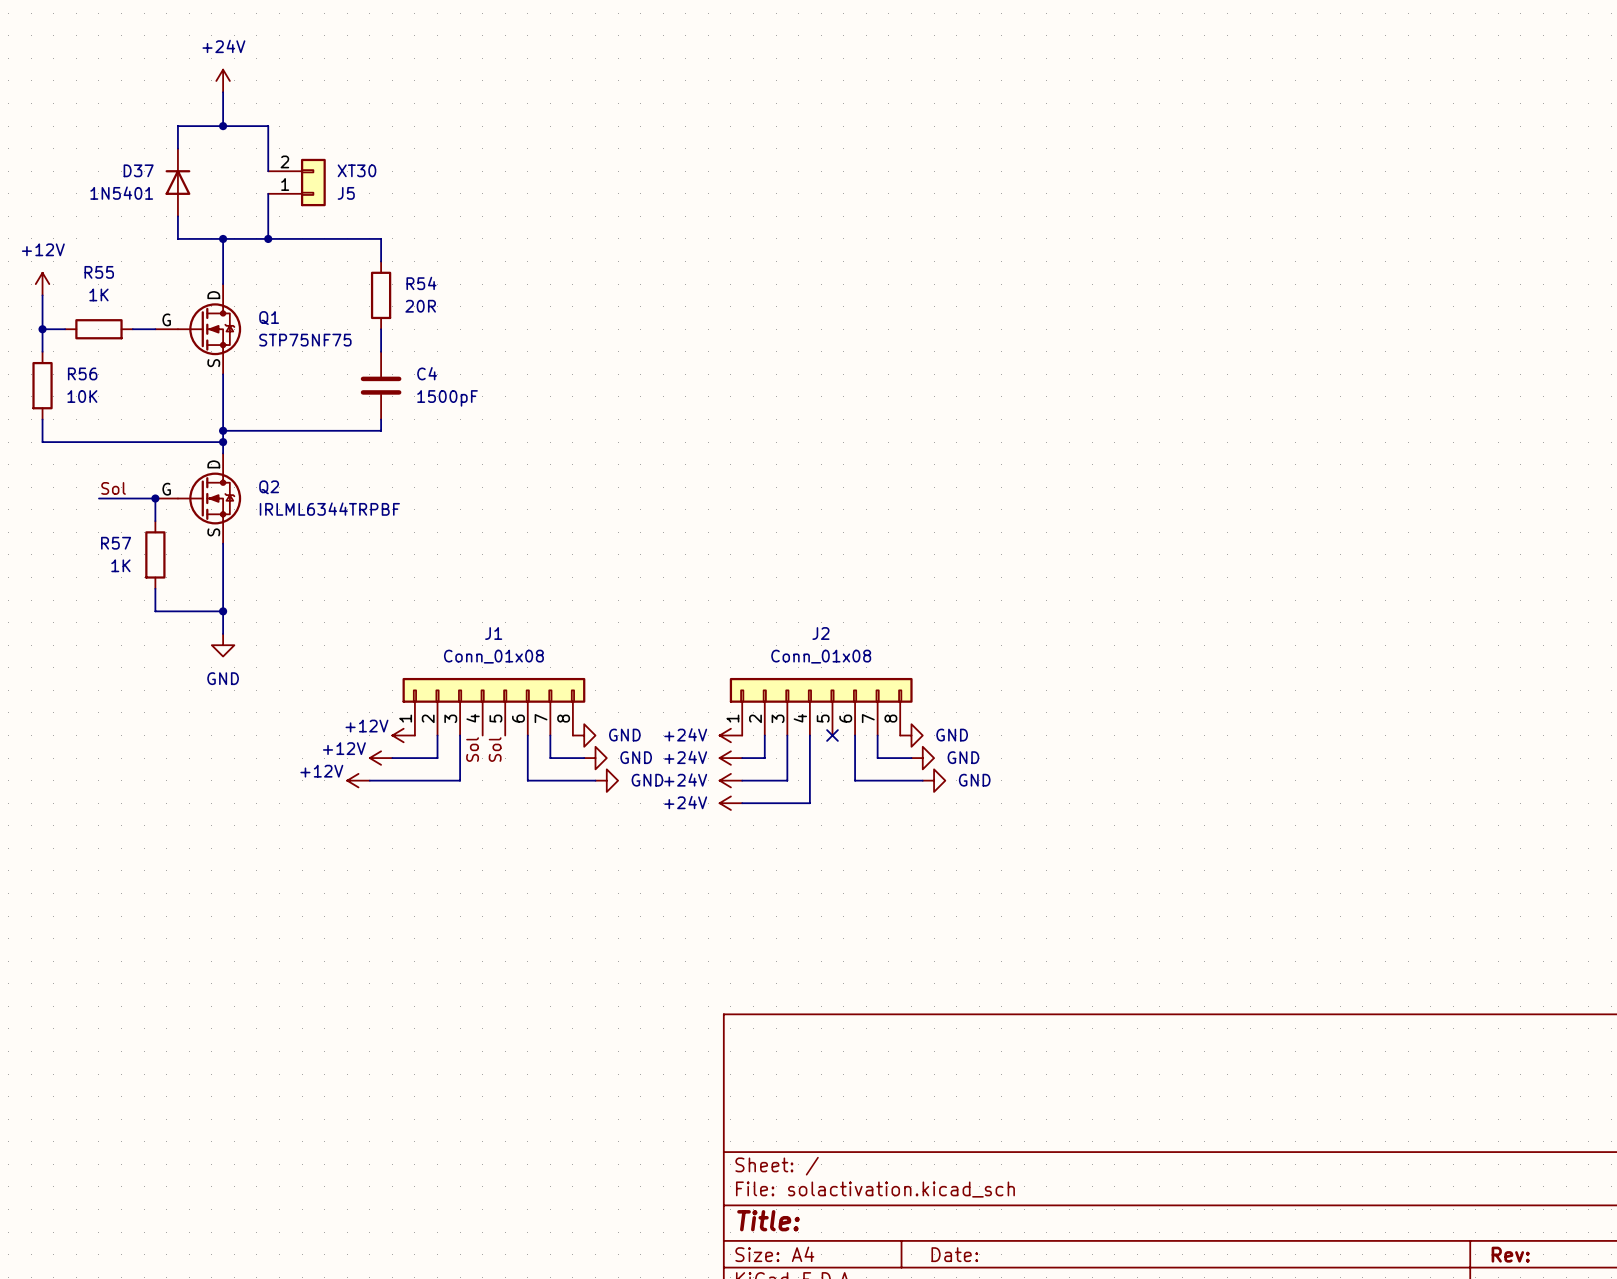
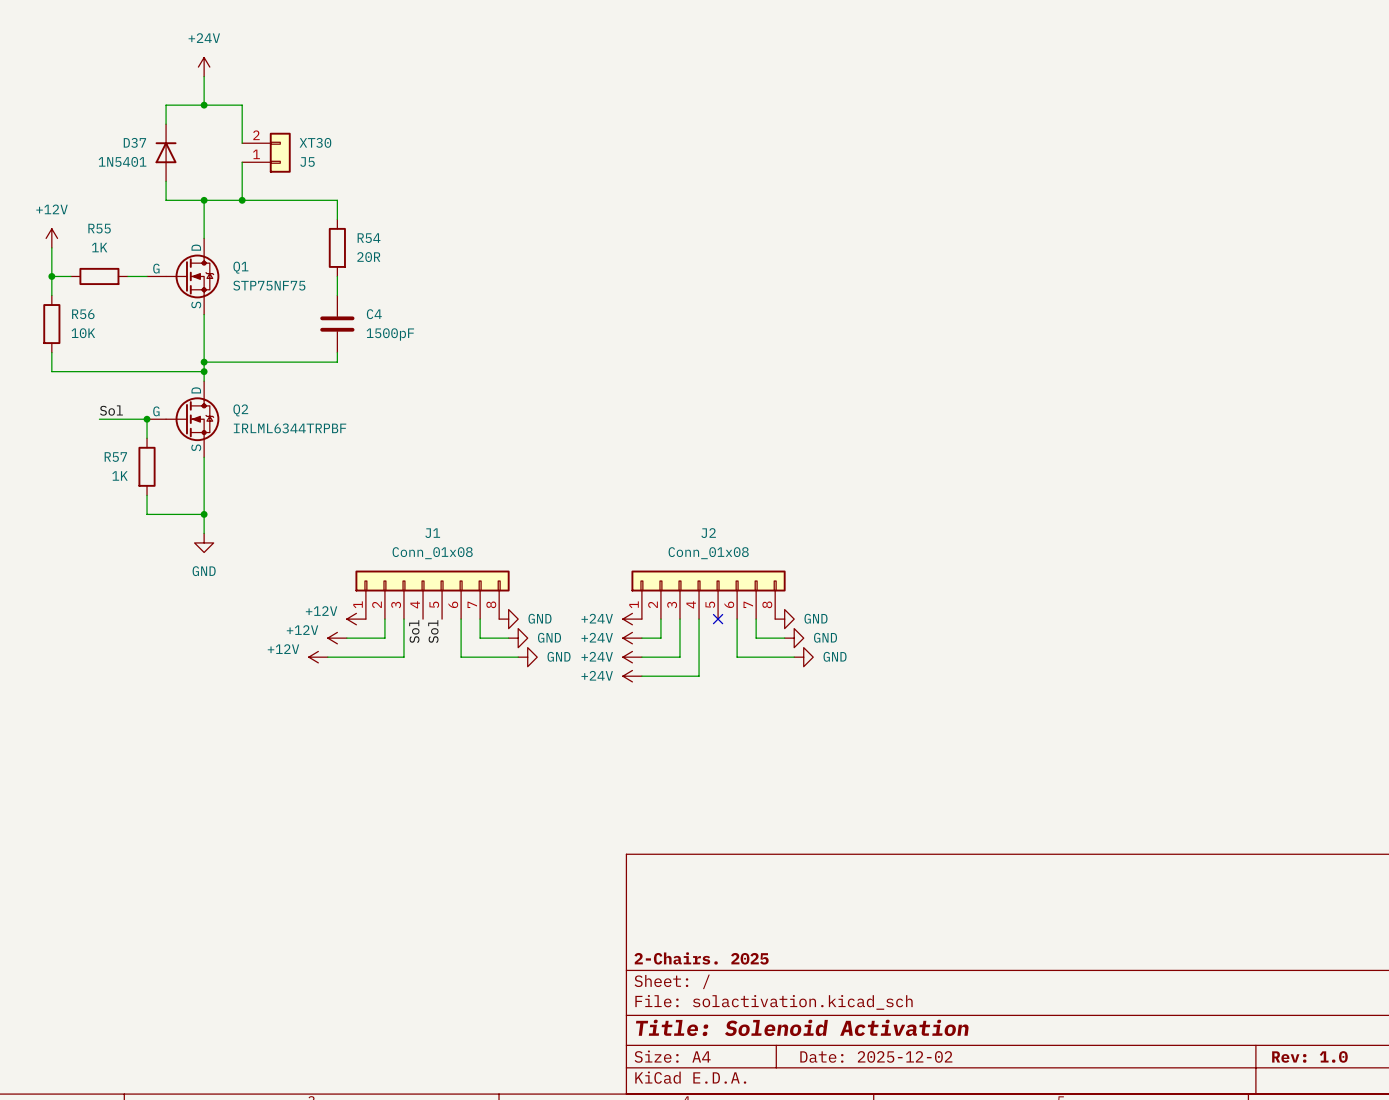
title block: none -> 2-Chairs. 2025 (701, 958)
title block: Title: (768, 1220) -> Title: Solenoid Activation (802, 1027)
title block: Date: (954, 1254) -> Date: 2025-12-02 (876, 1056)
title block: Rev: (1510, 1254) -> Rev: 1.0 (1309, 1056)

